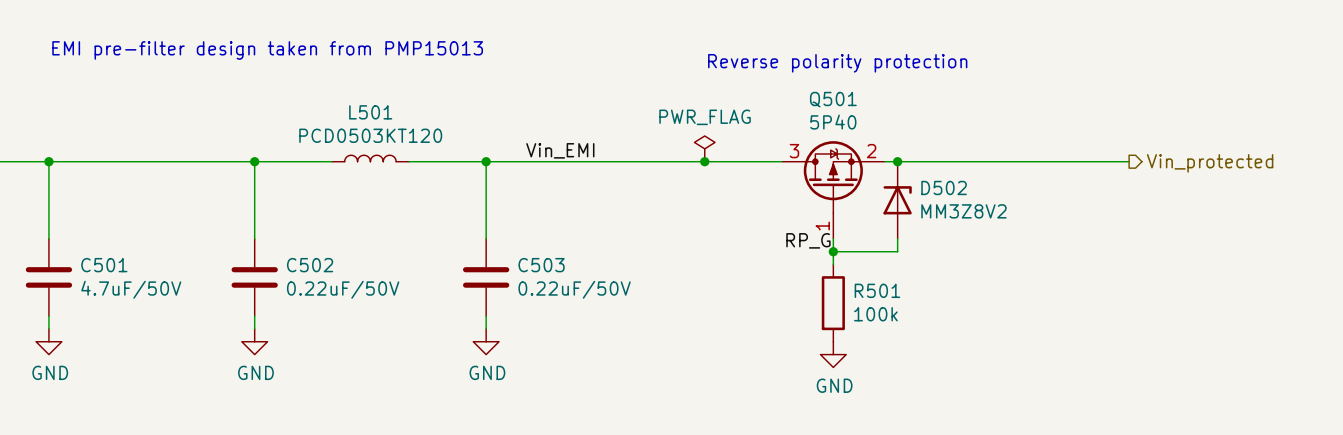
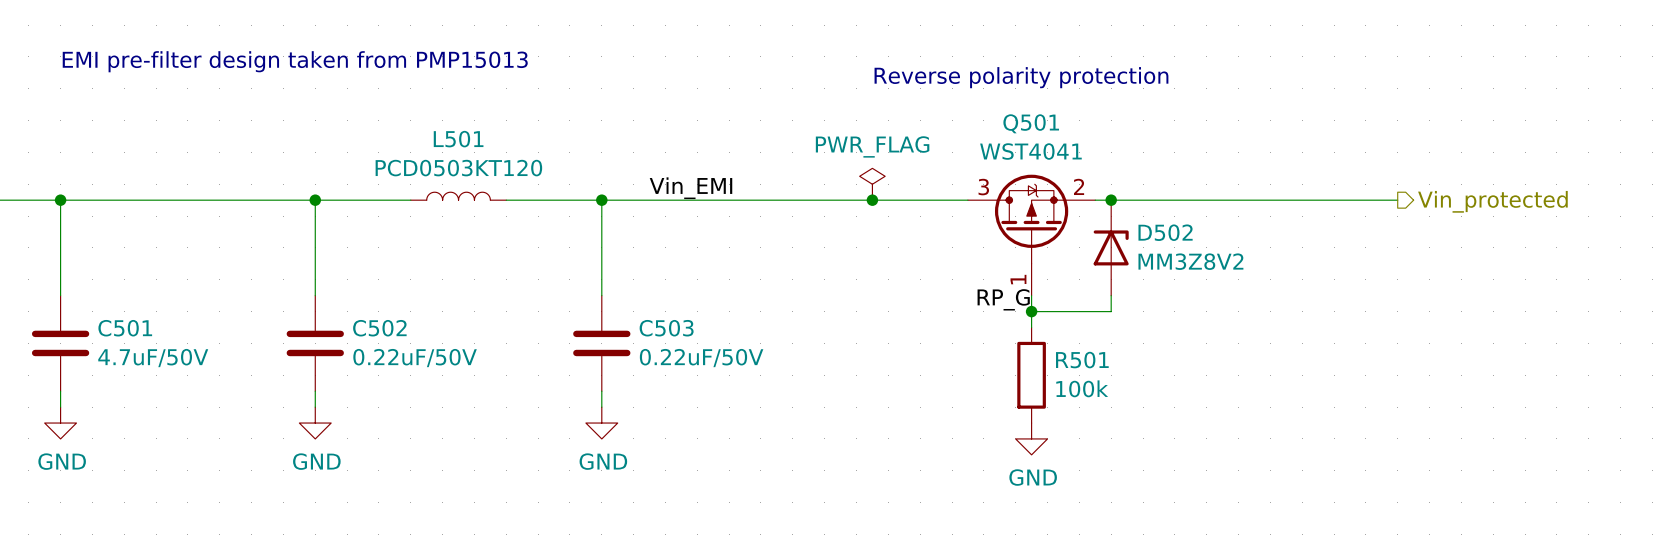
Q501 value: 5P40 (833, 122) -> WST4041 (1030, 151)

